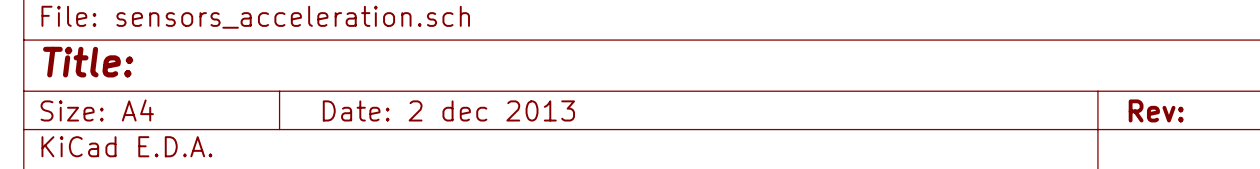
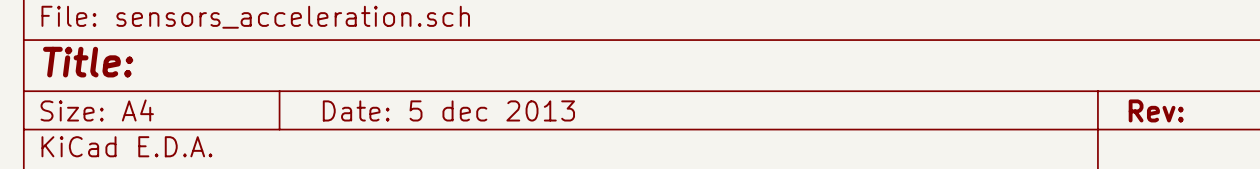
title block: Date: 2 dec 2013 (448, 110) -> Date: 5 dec 2013 (448, 110)

